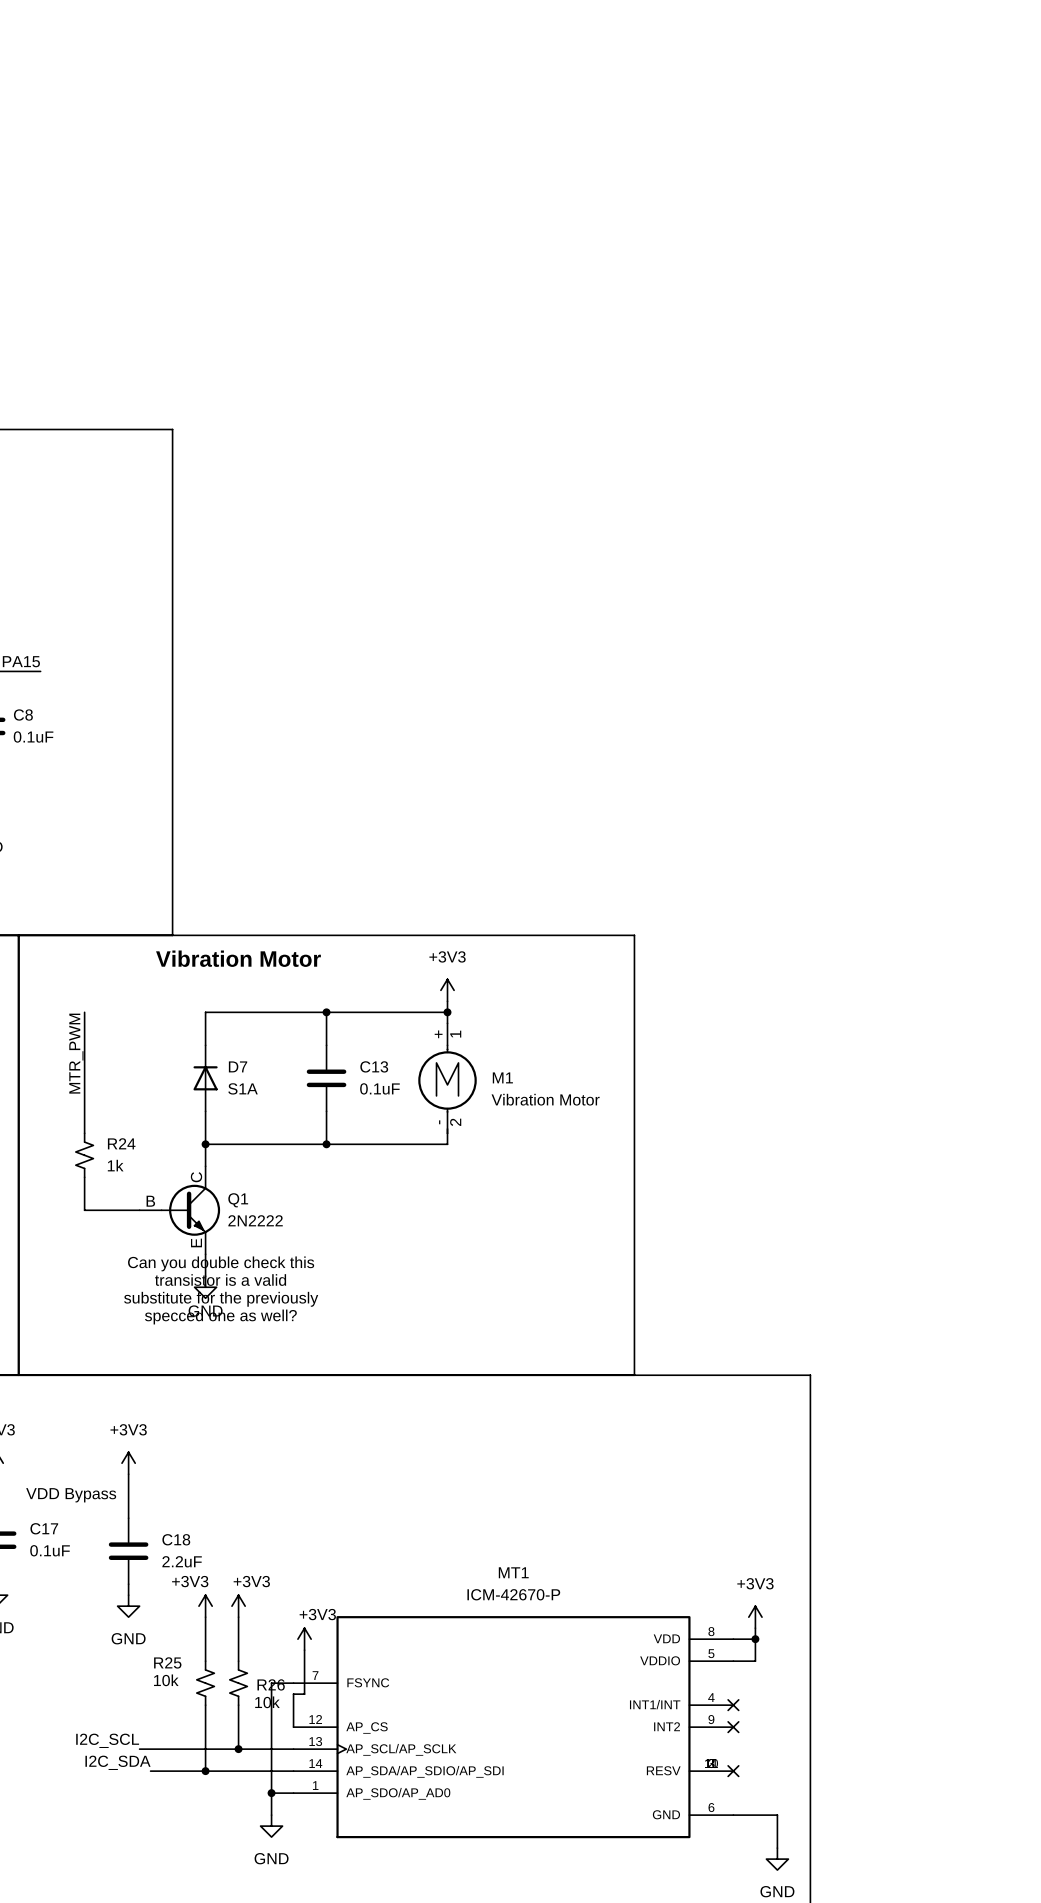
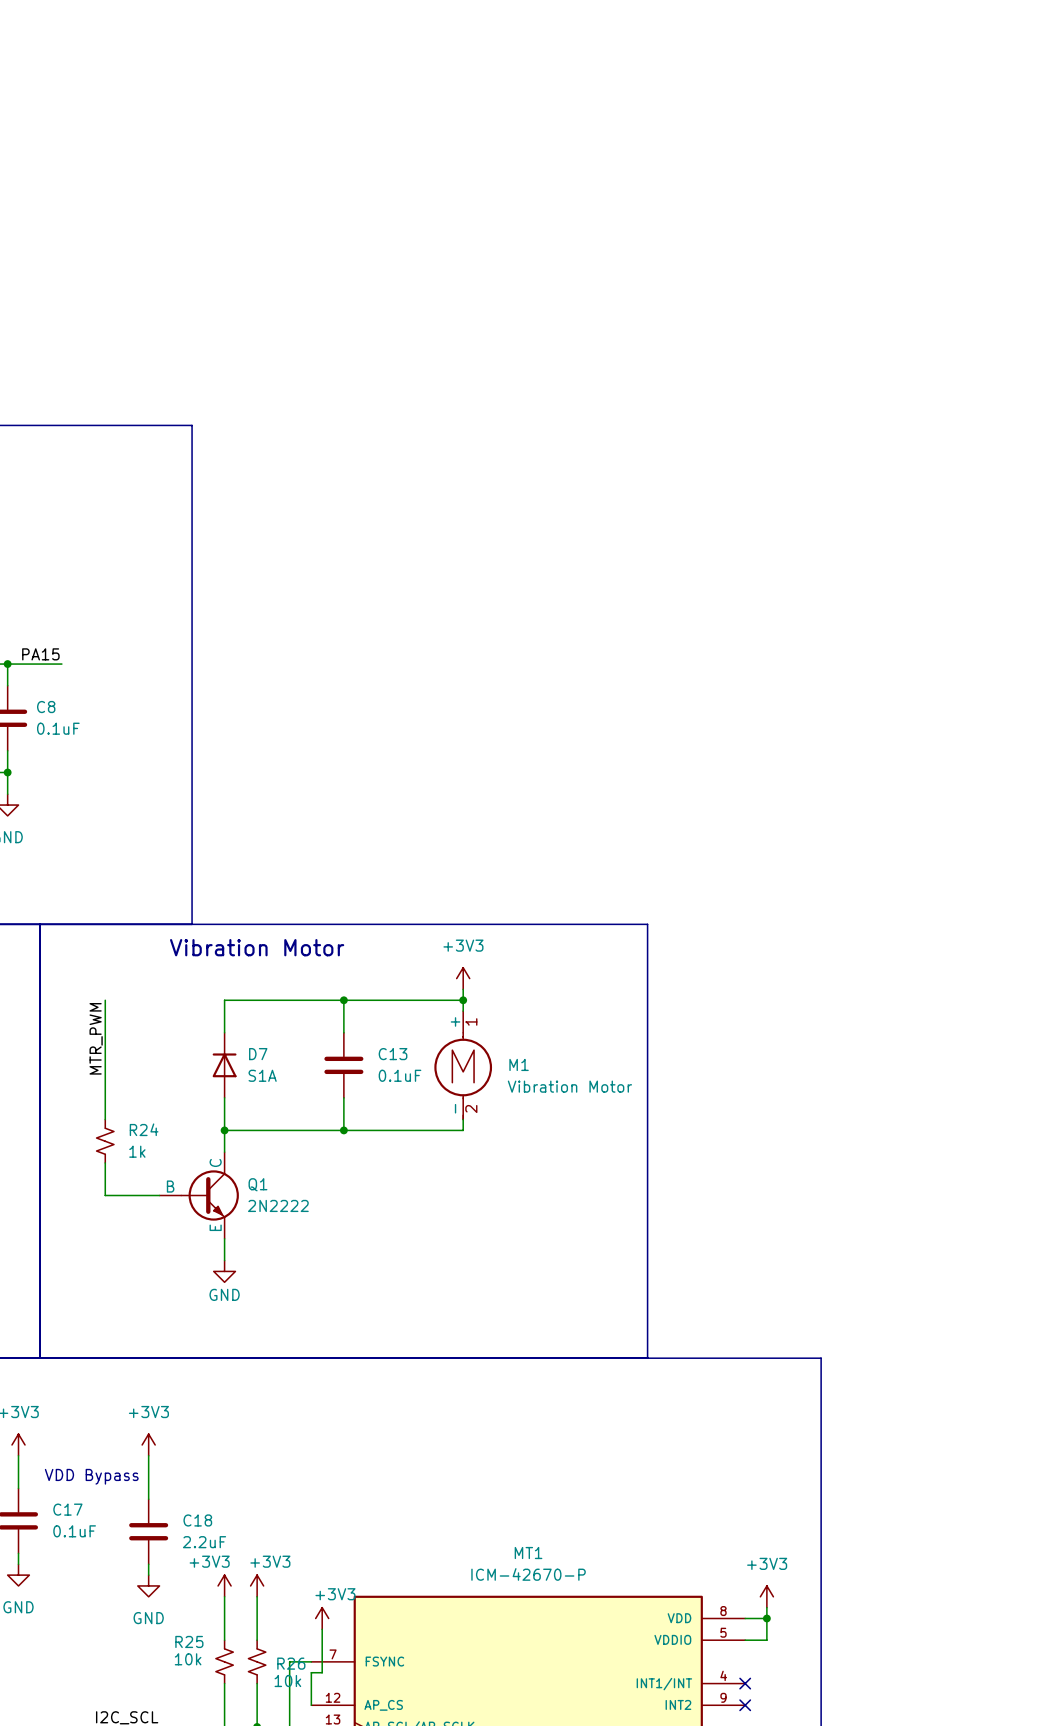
text: Can you double check this (221, 1263) -> none
text: transistor is a valid (220, 1280) -> none
text: substitute for the previously (221, 1299) -> none
text: specced one as well? (220, 1317) -> none

